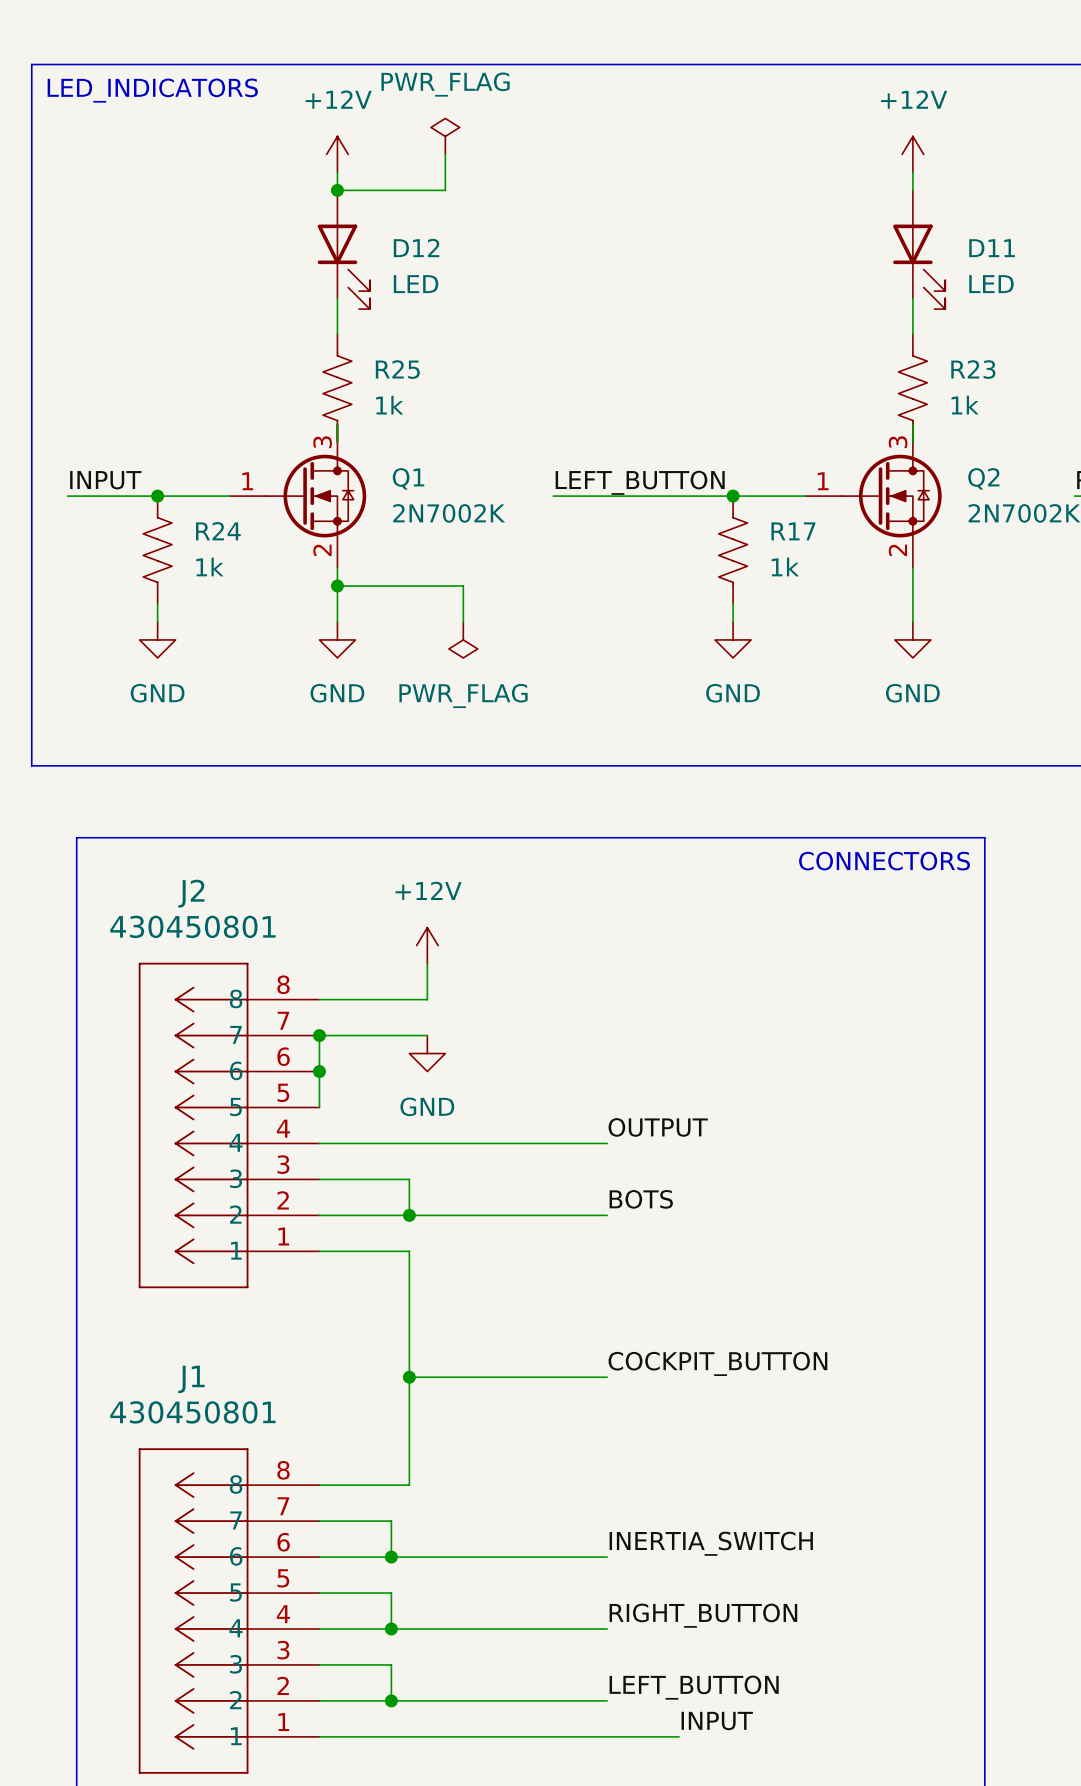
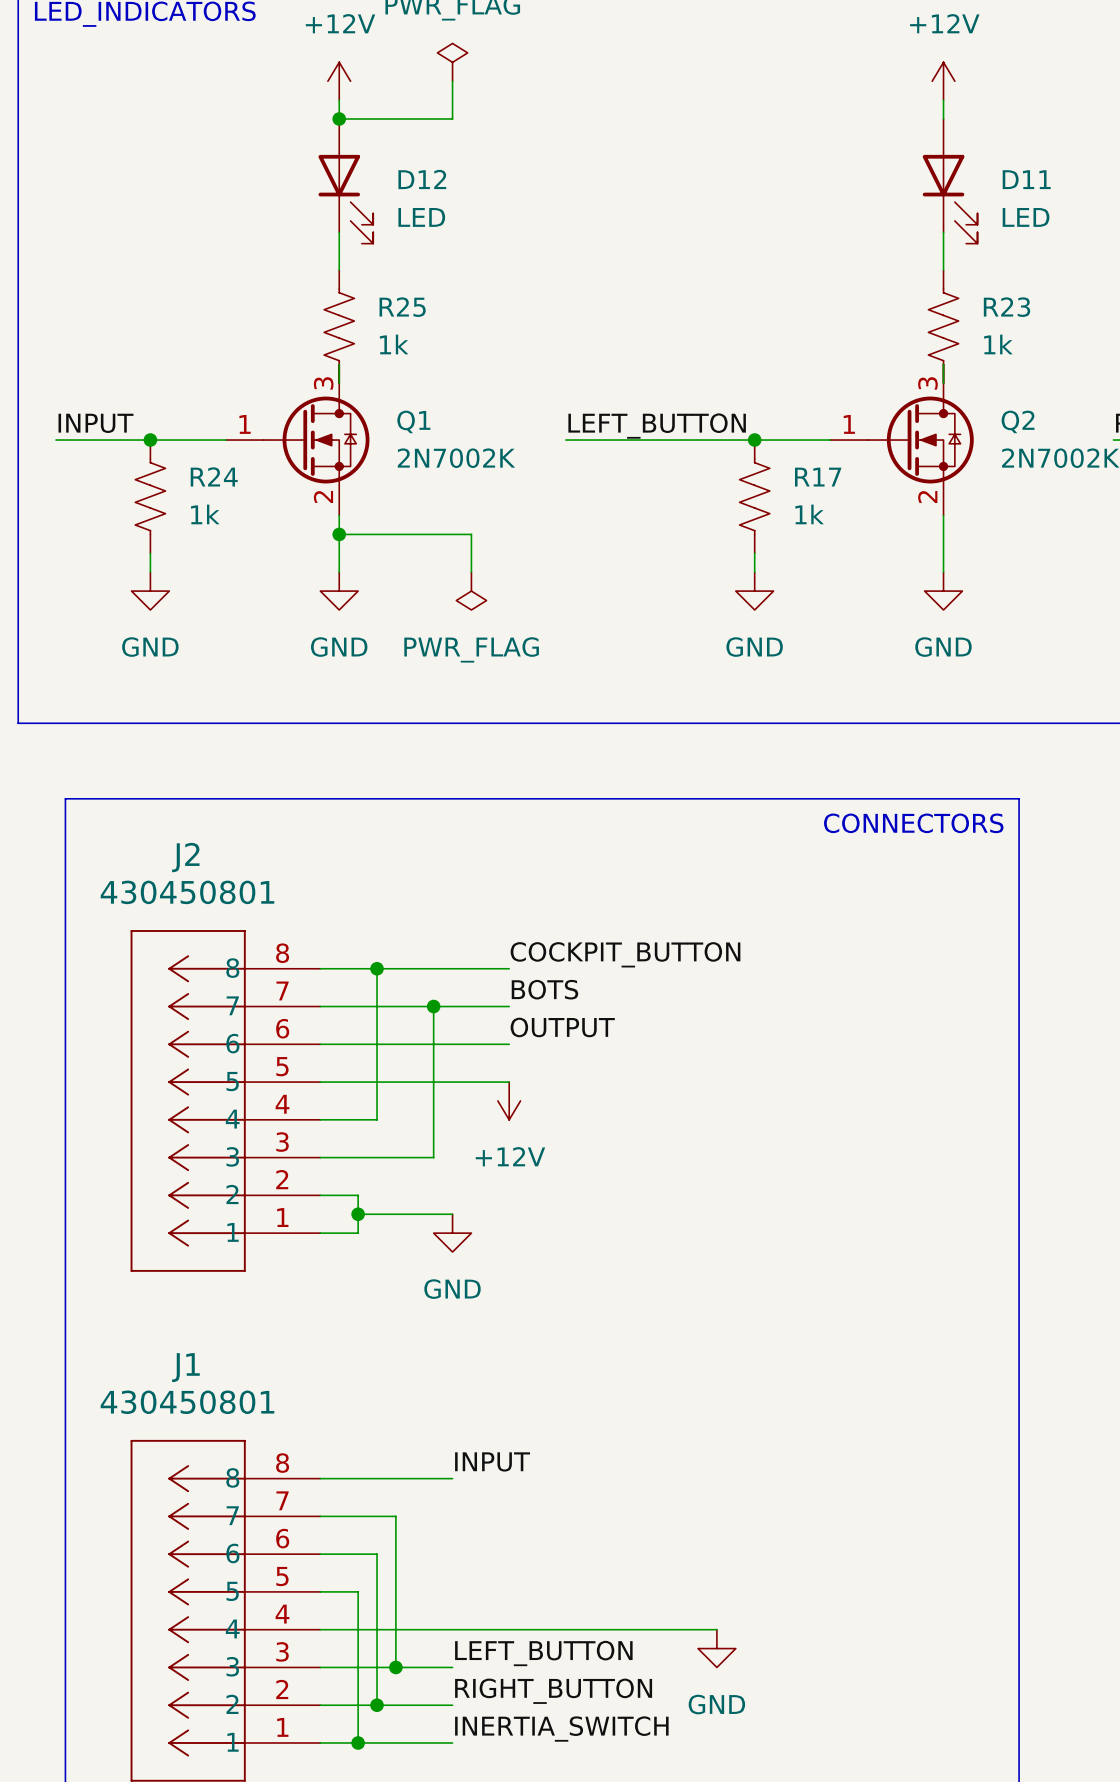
power symbol rotation: 0° (427, 945) -> 180° (509, 1100)
power symbol position: +12V (427, 945) -> +12V (509, 1100)
wire: (427, 963) (427, 999) -> (509, 968) (433, 968)
label: none -> COCKPIT_BUTTON (625, 954)
junction: none -> (377, 968)
wire: (319, 1035) (319, 1107) -> (509, 1082) (320, 1082)
junction: (319, 1035) -> none
junction: none -> (433, 1006)
power symbol position: GND (427, 1053) -> GND (452, 1233)
wire: none -> (320, 1044) (509, 1044)
junction: (319, 1071) -> none
label position: OUTPUT (658, 1127) -> OUTPUT (562, 1027)
wire: (373, 1143) (607, 1143) -> (377, 1119) (377, 968)
wire: (409, 1179) (409, 1215) -> (414, 1157) (433, 1157) (433, 1006) (509, 1006)
label position: BOTS (641, 1199) -> BOTS (544, 989)
wire: (355, 1215) (607, 1215) -> (358, 1195) (358, 1233)
junction position: (409, 1215) -> (358, 1214)
wire: none -> (358, 1214) (452, 1214)
wire: (355, 1251) (409, 1251) (409, 1485) -> (452, 1478) (414, 1478)
label: COCKPIT_BUTTON (717, 1363) -> none
wire: (409, 1377) (607, 1377) -> none
junction: (409, 1377) -> none
label position: INERTIA_SWITCH (711, 1543) -> INERTIA_SWITCH (561, 1729)
wire: (373, 1557) (607, 1557) -> (377, 1554) (377, 1705)
junction: (391, 1557) -> none
wire: (355, 1593) (391, 1593) -> (395, 1554) (395, 1591)
wire: none -> (358, 1591) (358, 1742)
label position: RIGHT_BUTTON (703, 1615) -> RIGHT_BUTTON (553, 1691)
wire: none -> (395, 1629) (395, 1667) (452, 1667)
junction: (391, 1628) -> none
wire: none -> (622, 1629) (716, 1629)
power symbol: none -> GND (716, 1648)
wire: (391, 1664) (391, 1700) -> none
junction: none -> (395, 1667)
label position: LEFT_BUTTON (694, 1687) -> LEFT_BUTTON (543, 1653)
junction: none -> (377, 1705)
junction: (391, 1700) -> none
wire: (445, 1700) (607, 1700) -> none
label position: INPUT (717, 1721) -> INPUT (492, 1461)
junction: none -> (358, 1742)
wire: (445, 1736) (679, 1736) -> none

